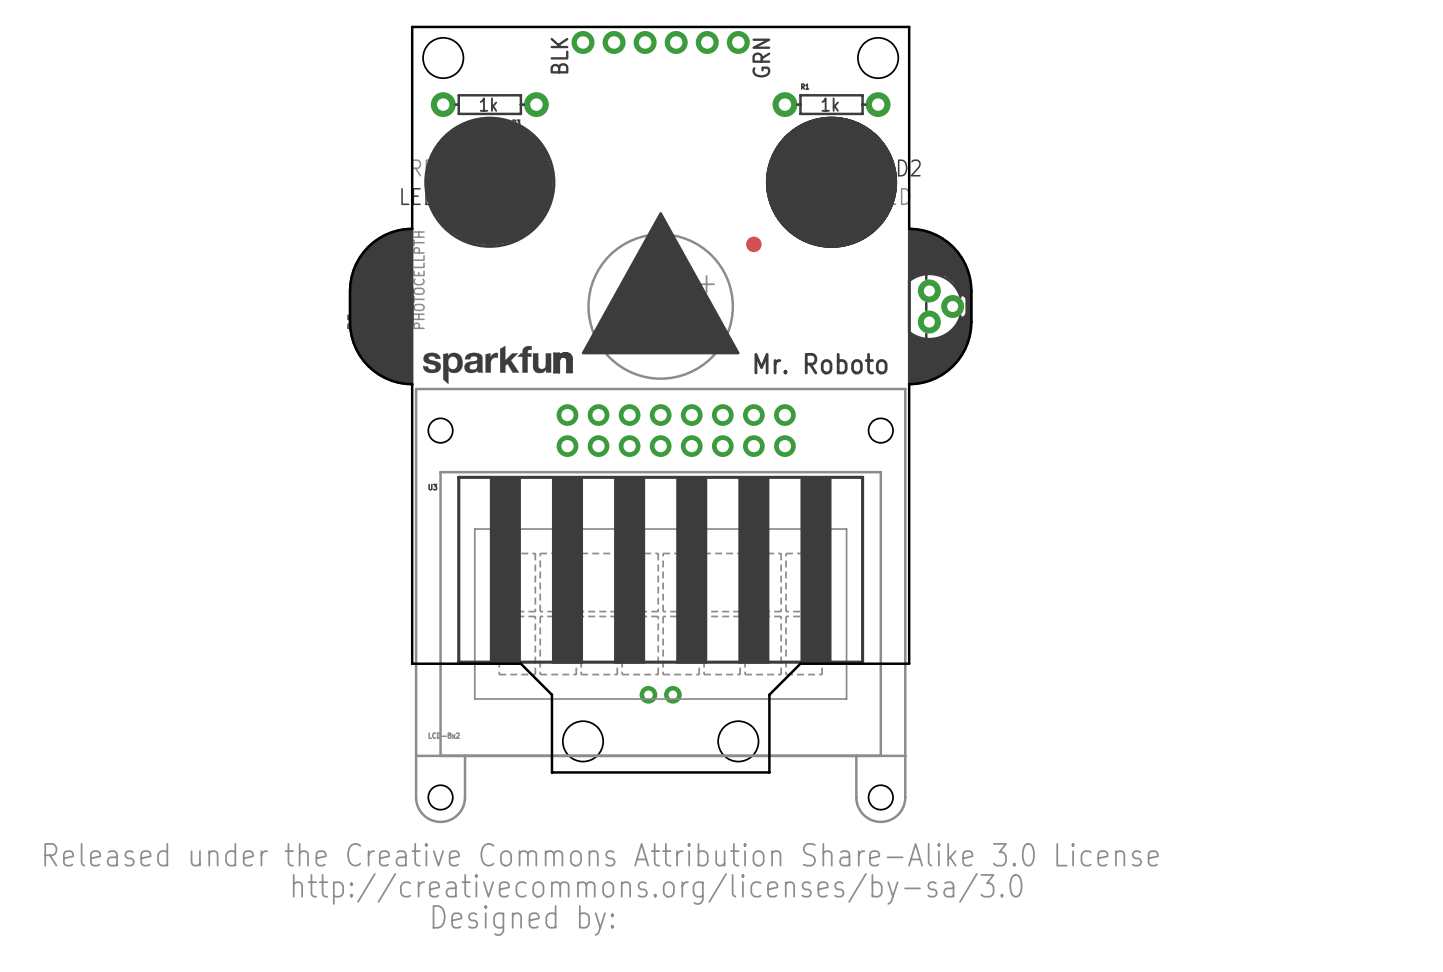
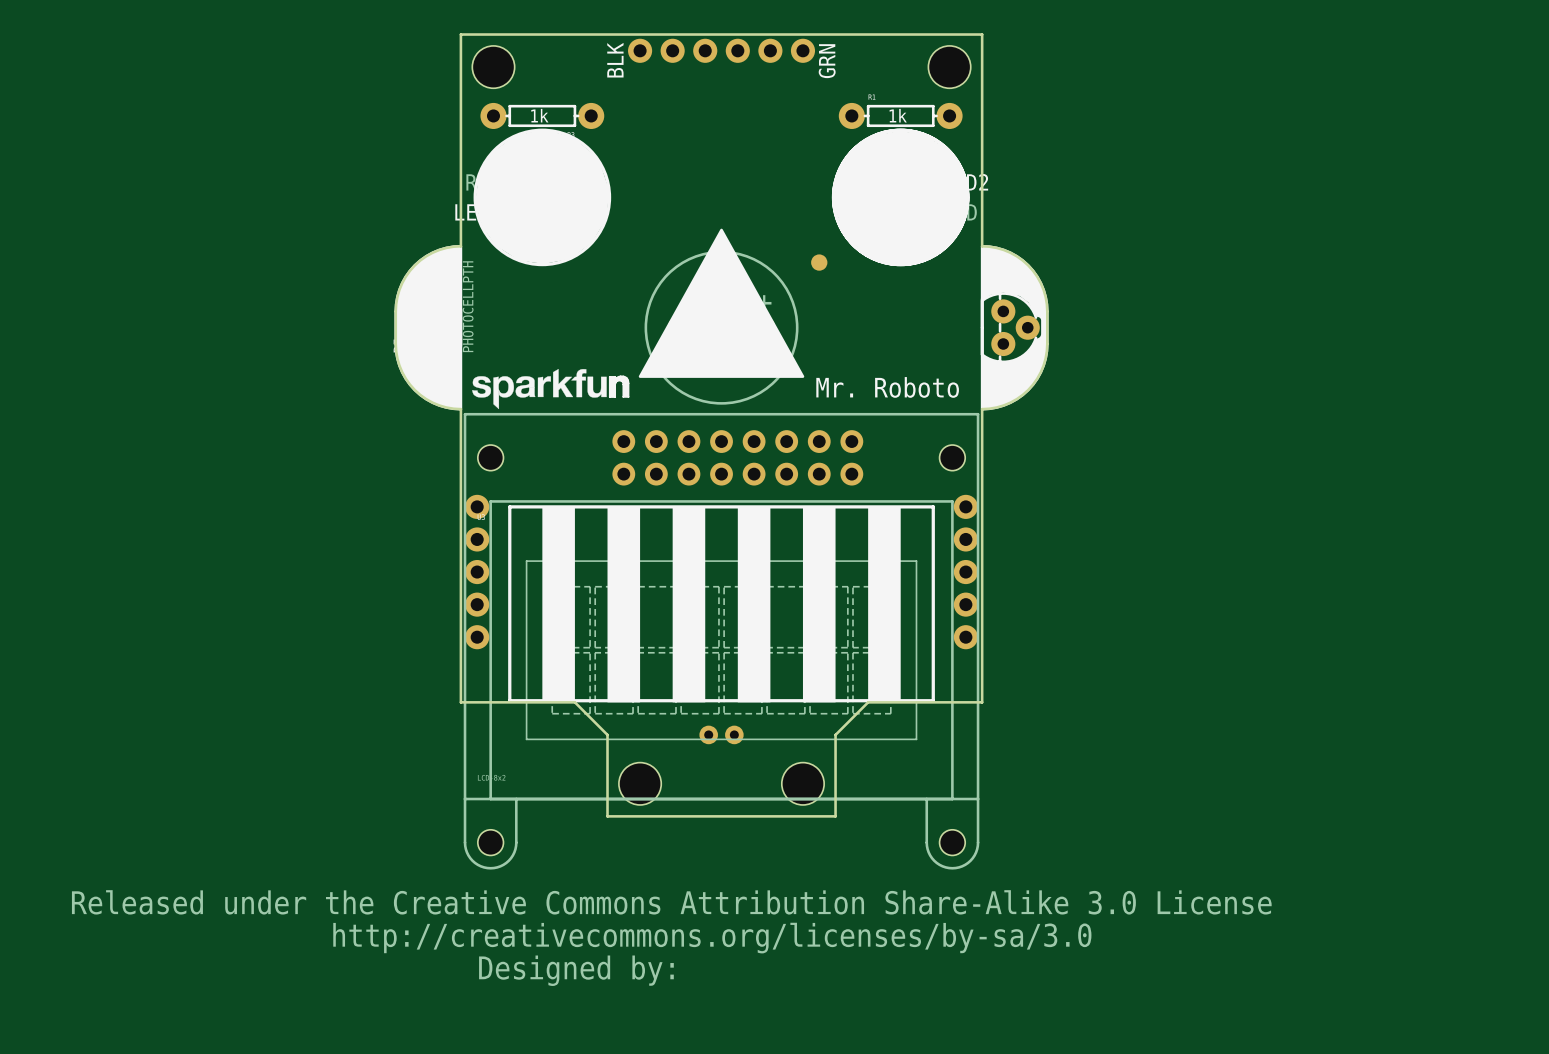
part: none -> (477, 572)
part: none -> (965, 572)

